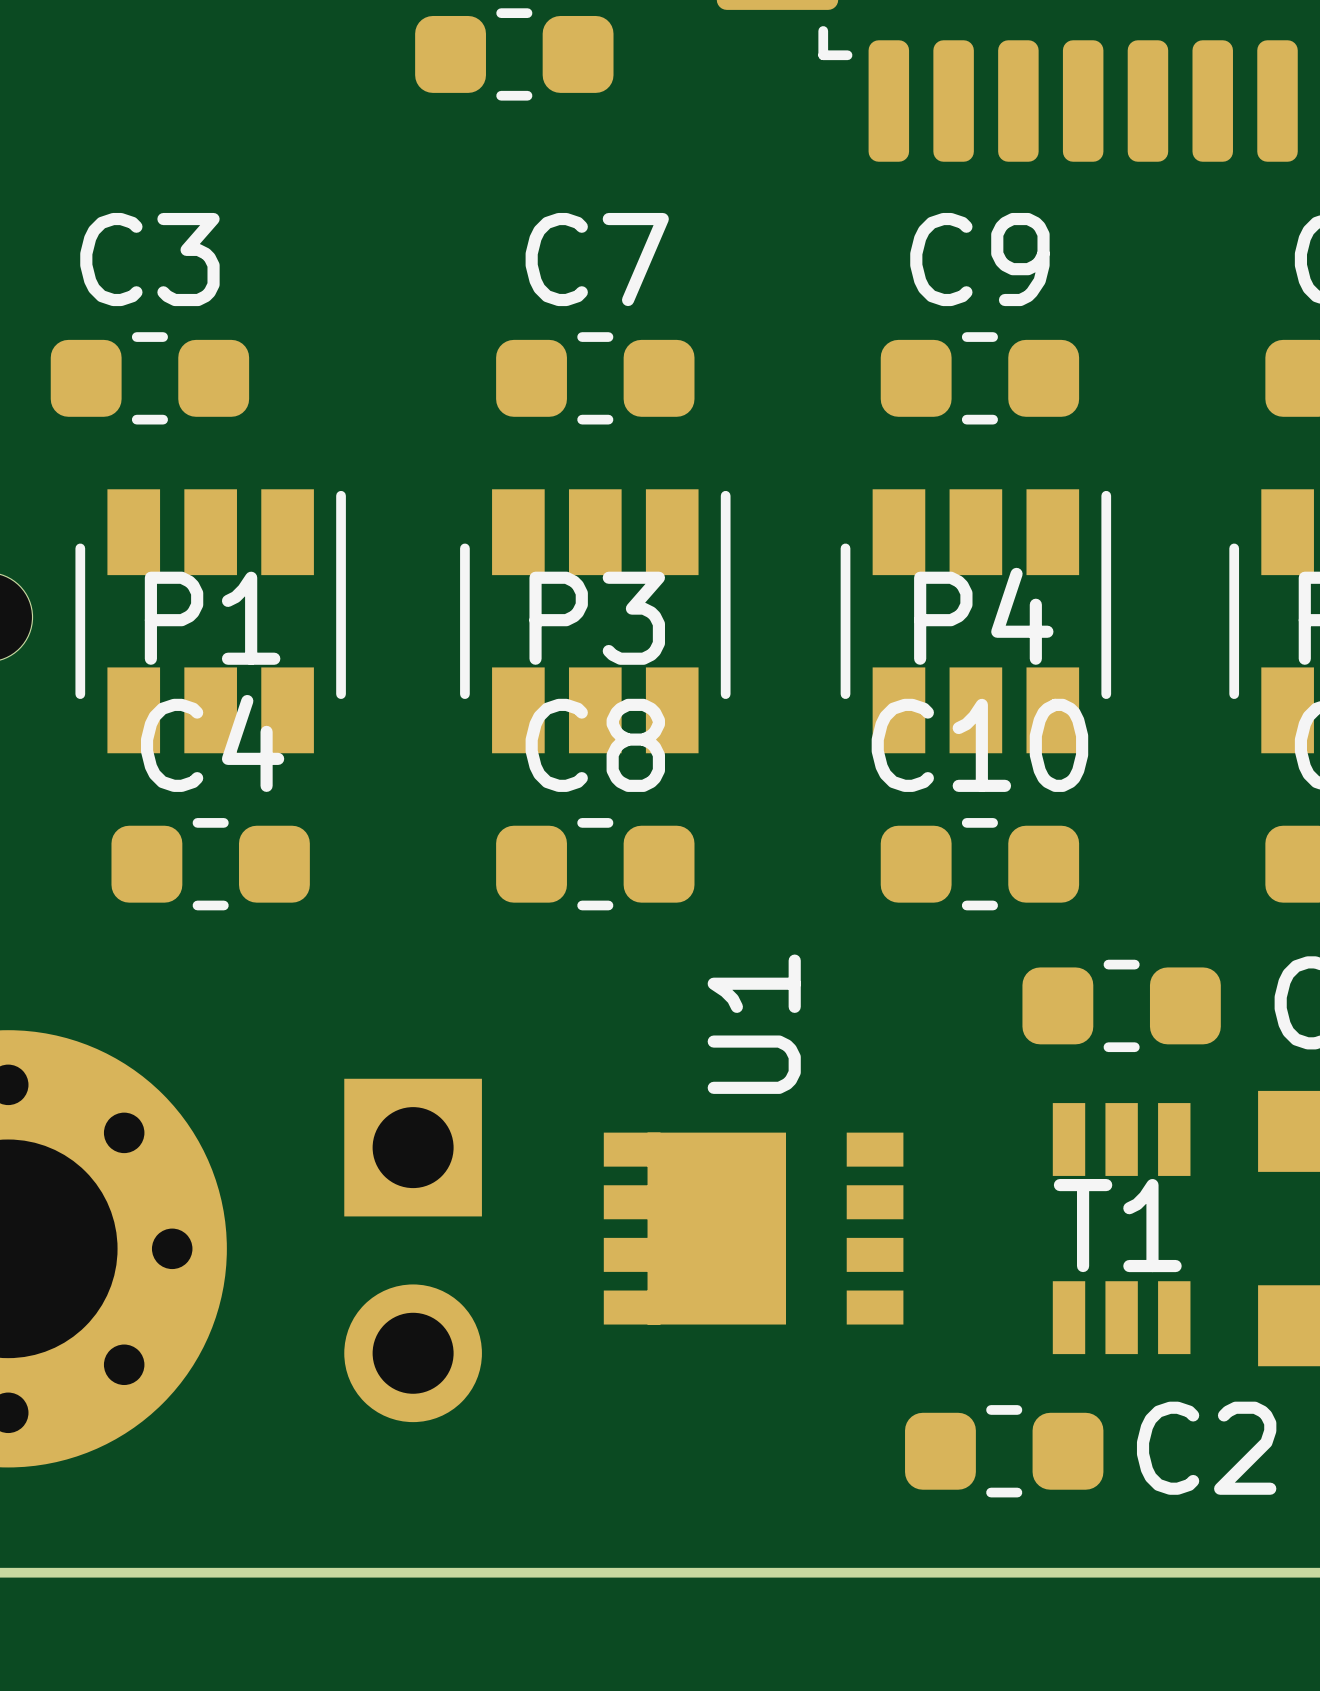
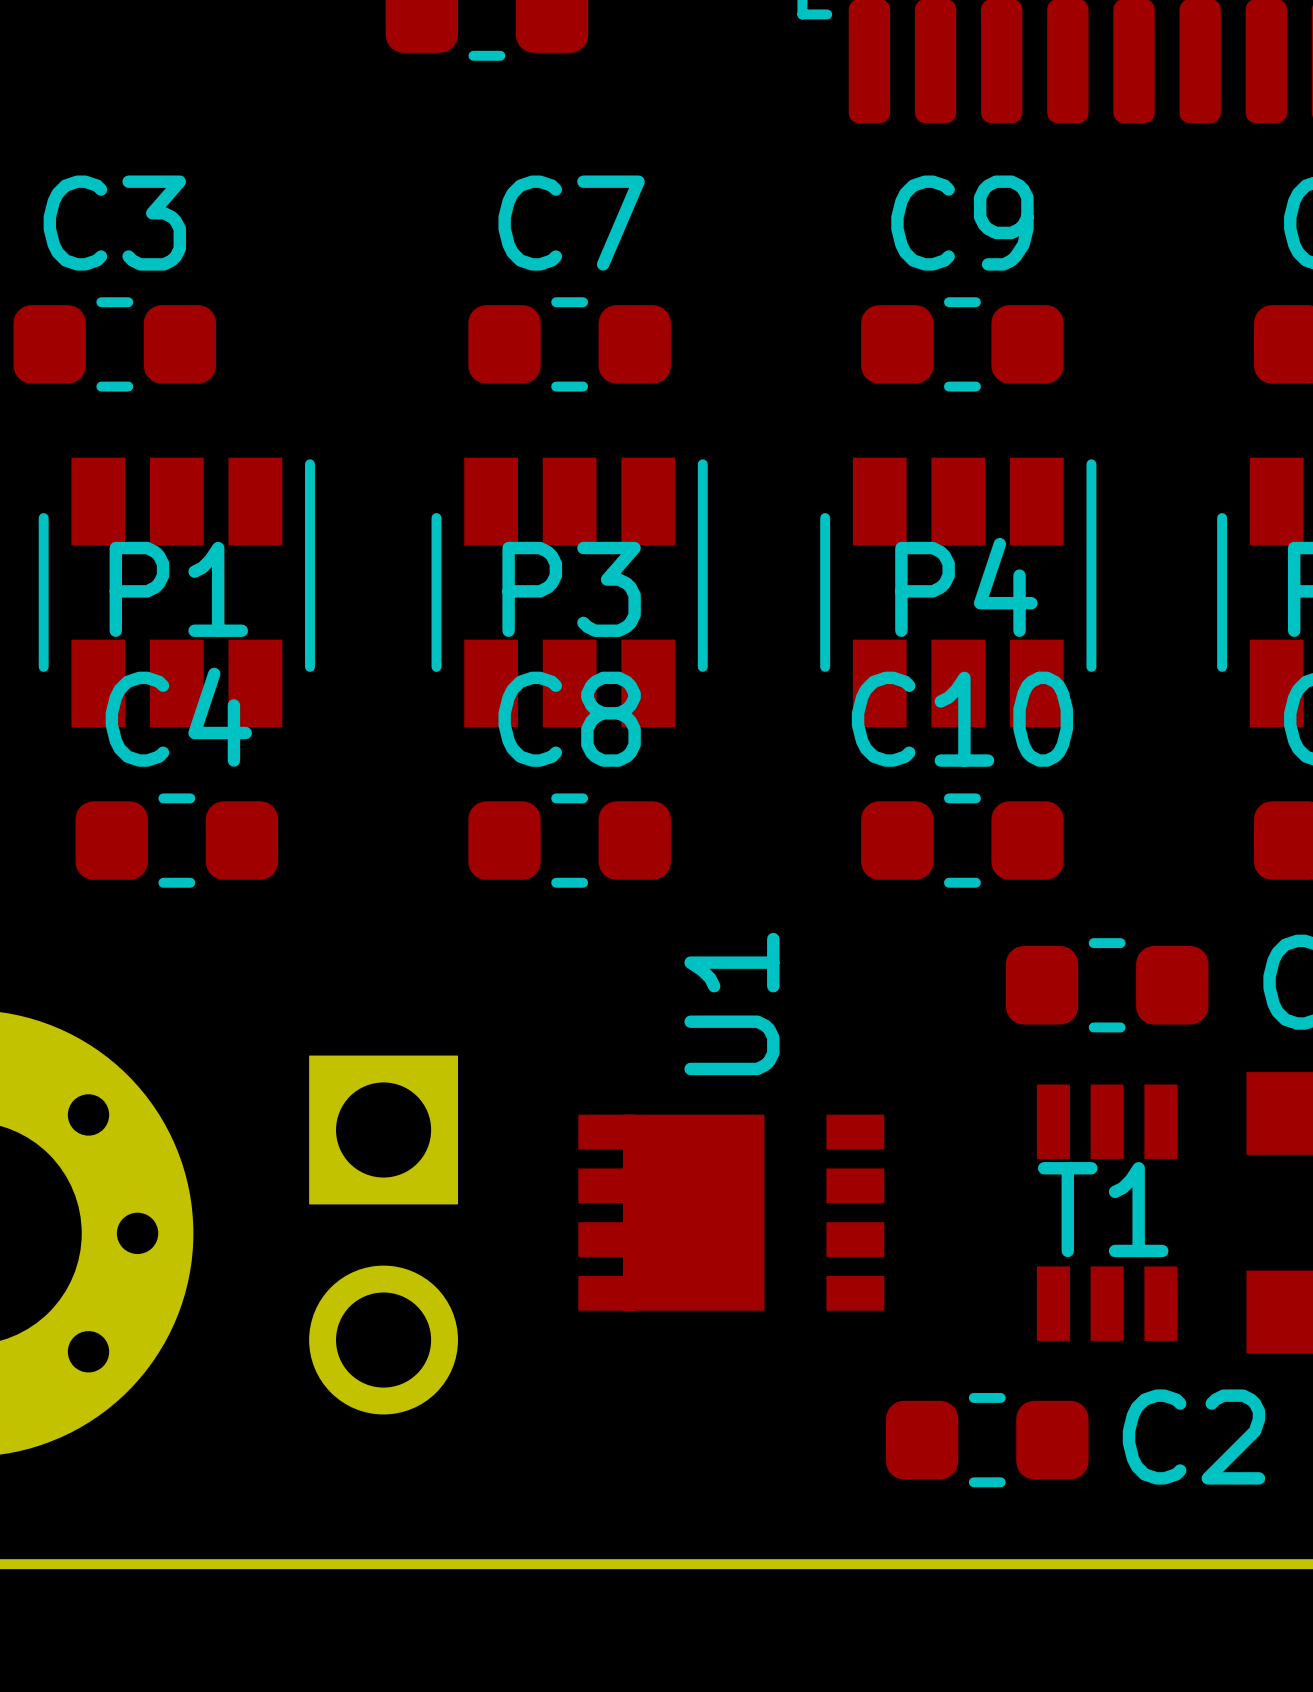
part footprint: [344, 1078, 482, 1423] -> [309, 1055, 458, 1415]

